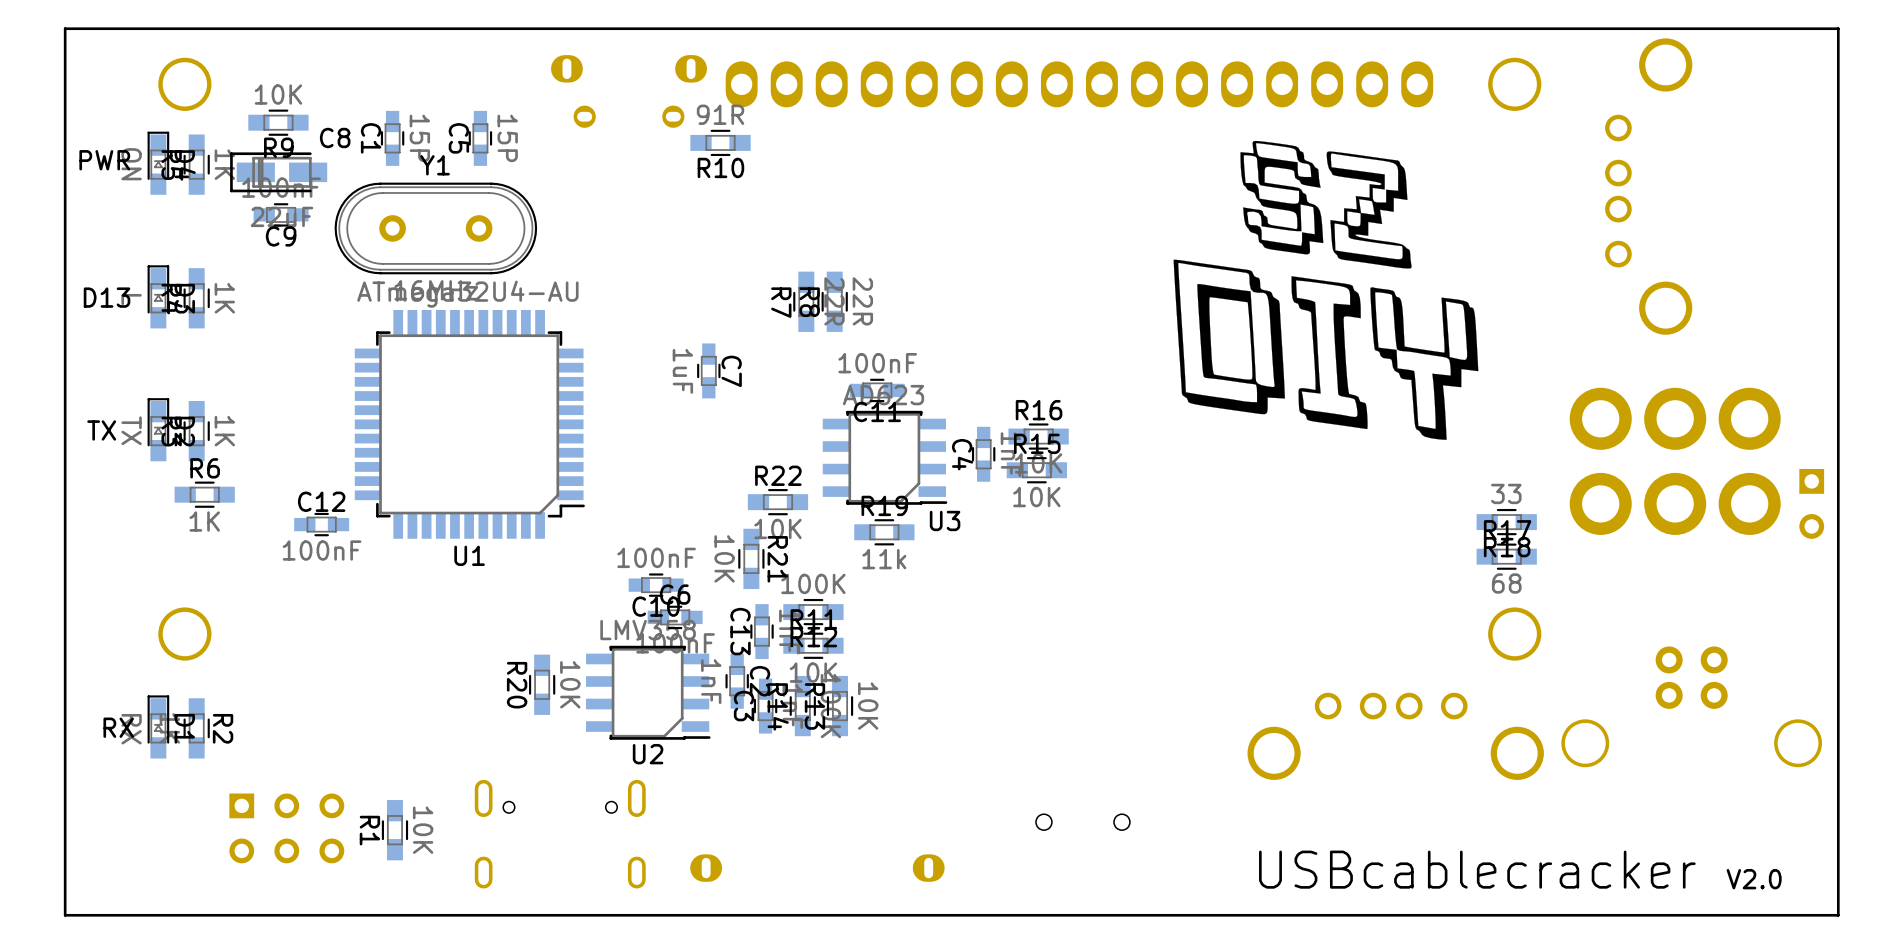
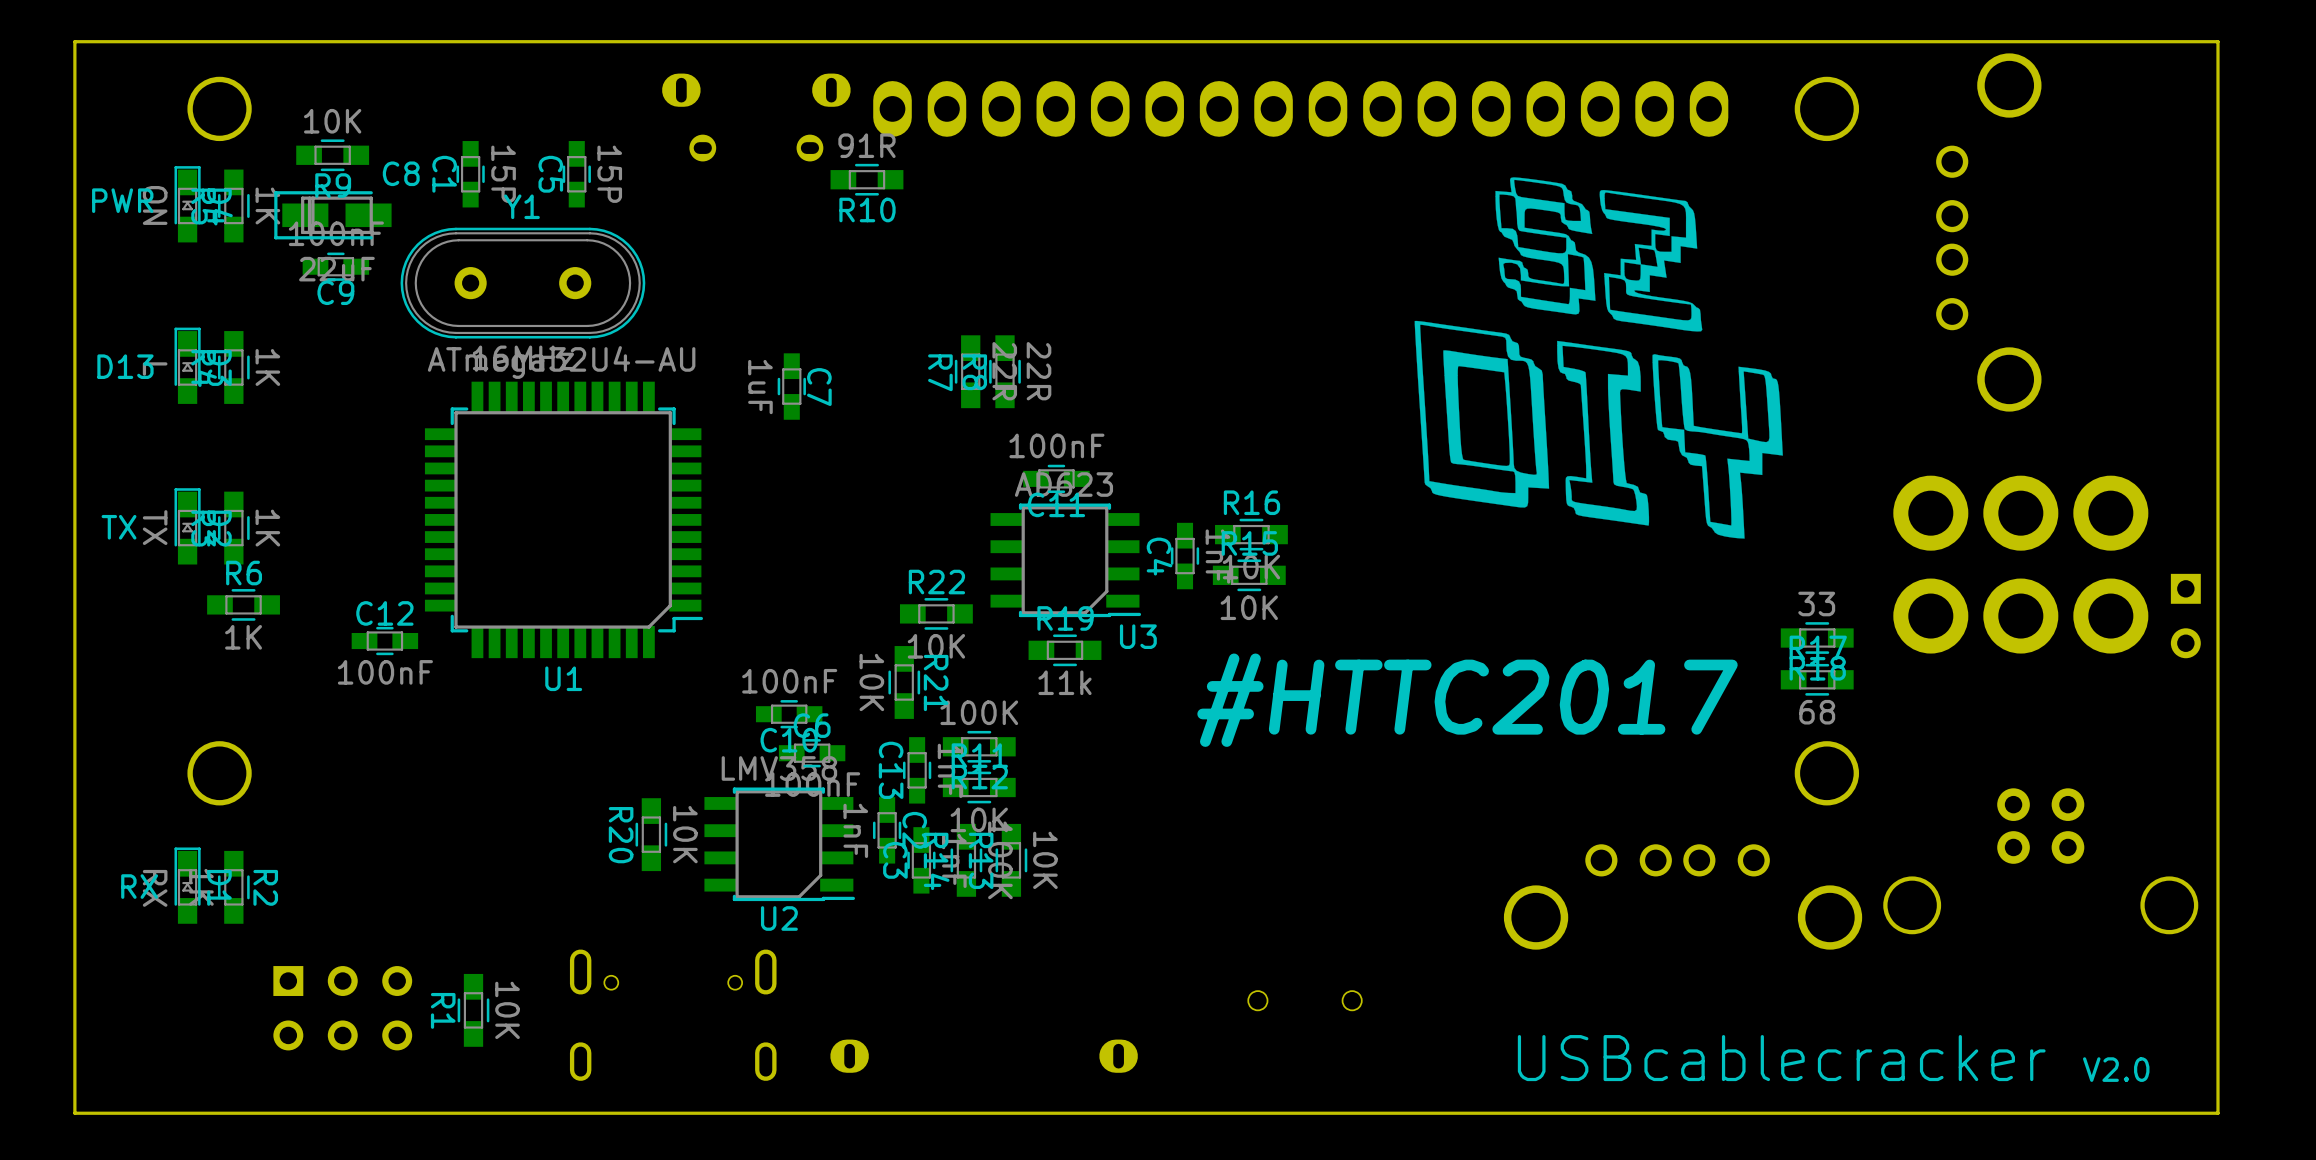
C7 position: (708, 370) -> (791, 386)
text: none -> #HTTC2017 (1467, 700)

